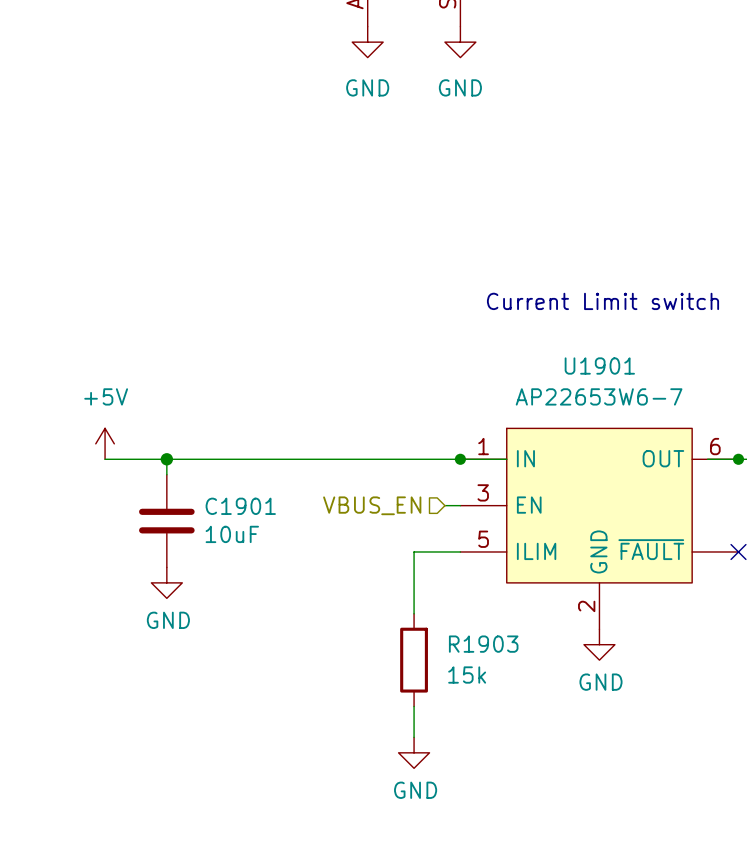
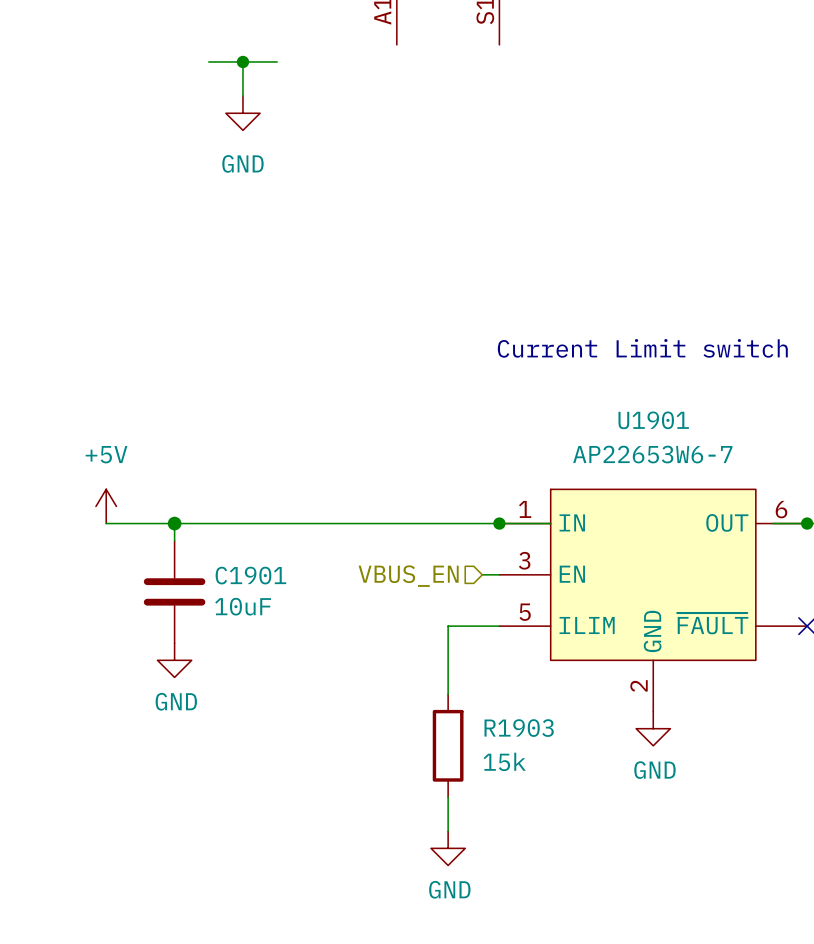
wire: none -> (208, 61) (277, 61)
wire: none -> (242, 61) (242, 96)
junction: none -> (242, 61)
power symbol: GND (367, 42) -> none
power symbol: GND (460, 42) -> none
power symbol: none -> GND (242, 113)

